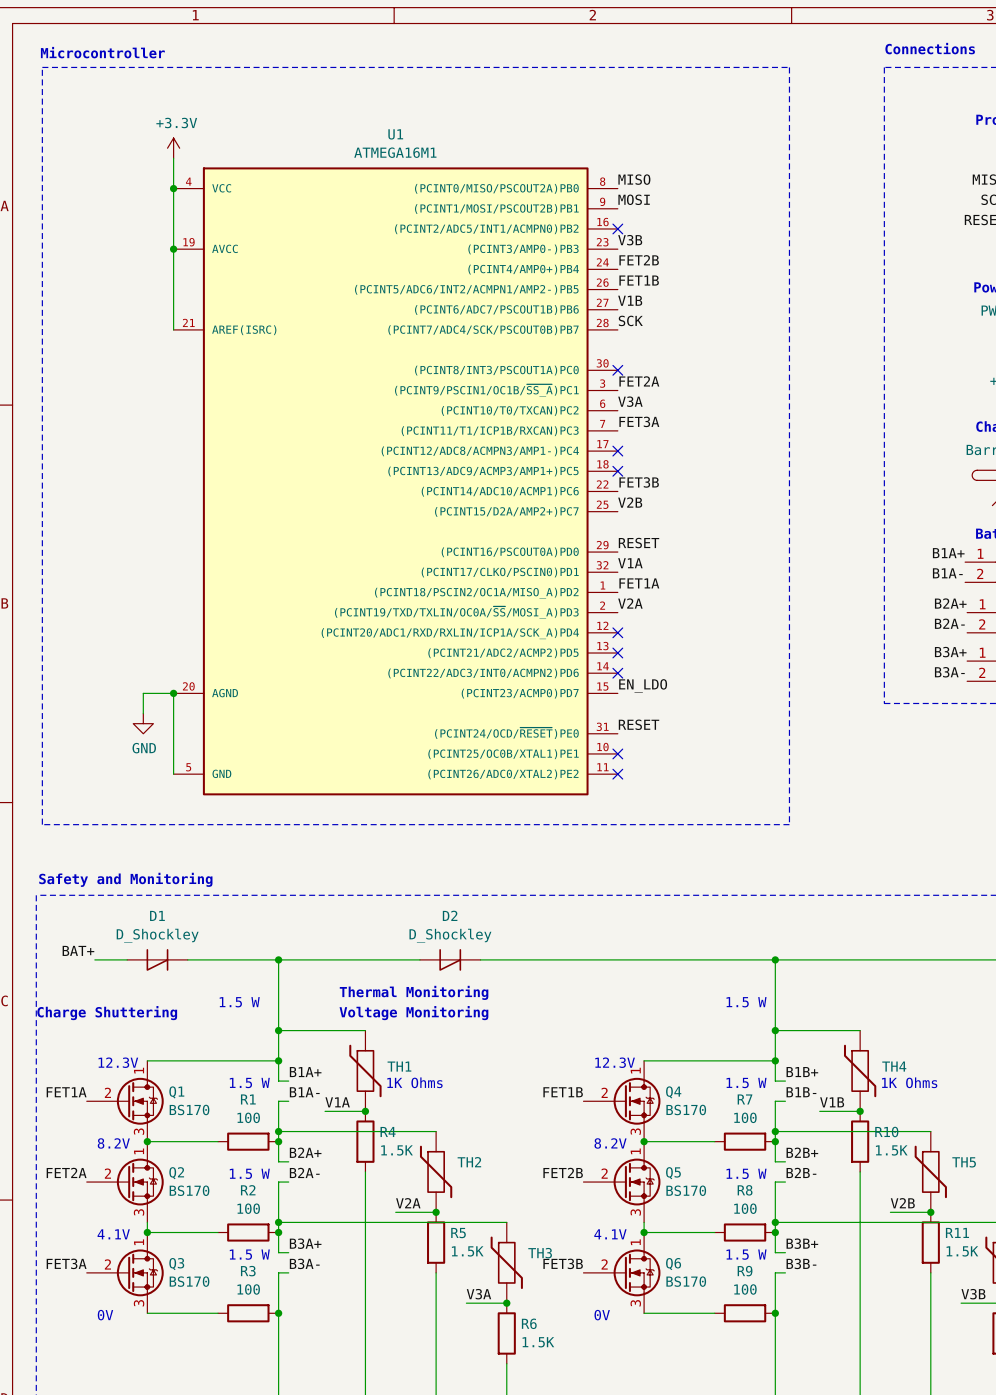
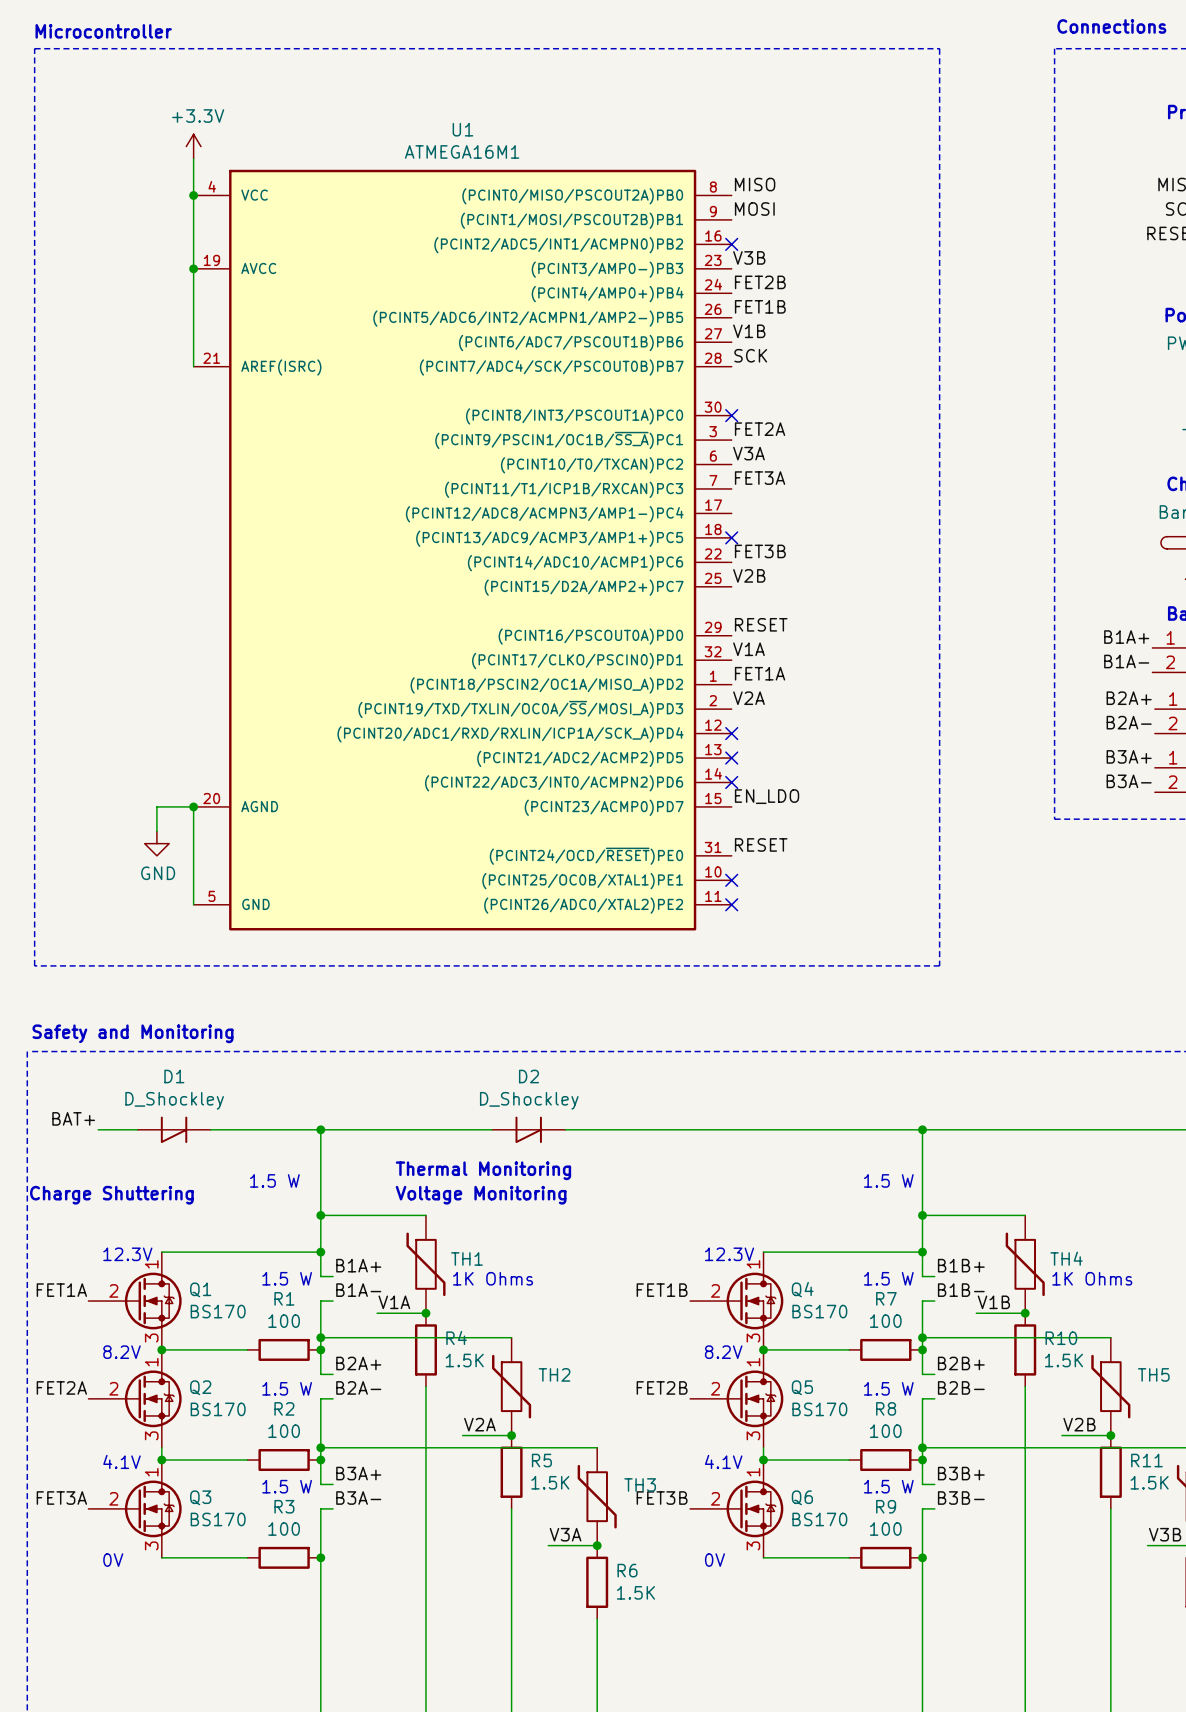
no-connect mark: (617, 451) -> none

